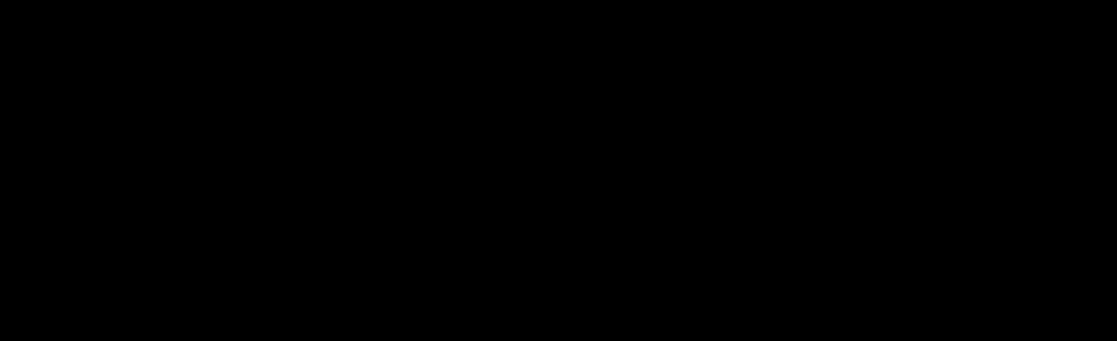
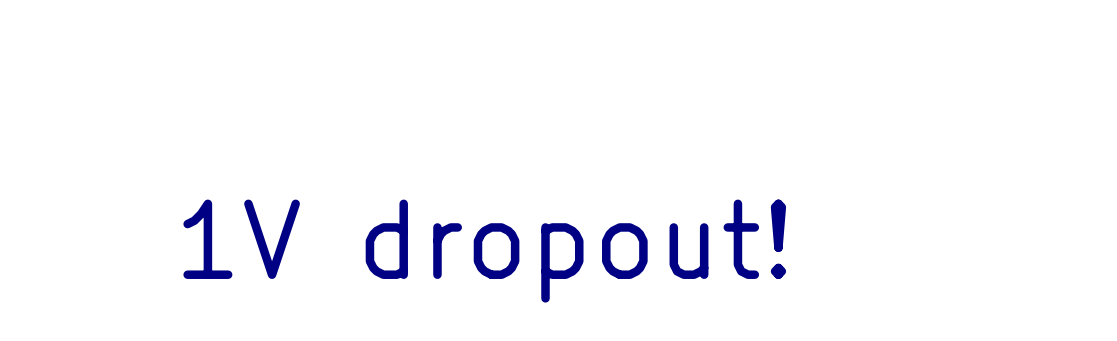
text: none -> 1V dropout! (484, 251)

